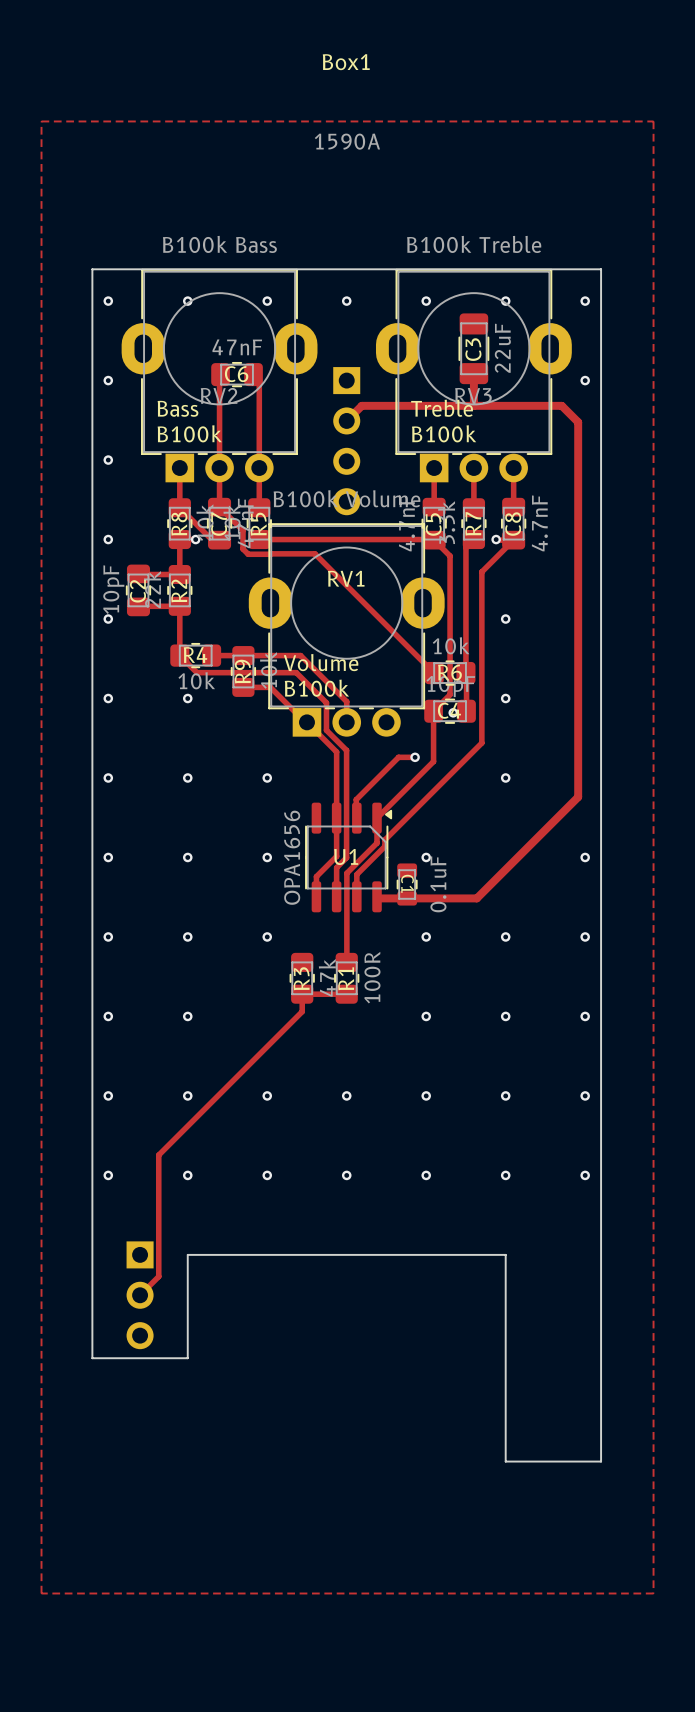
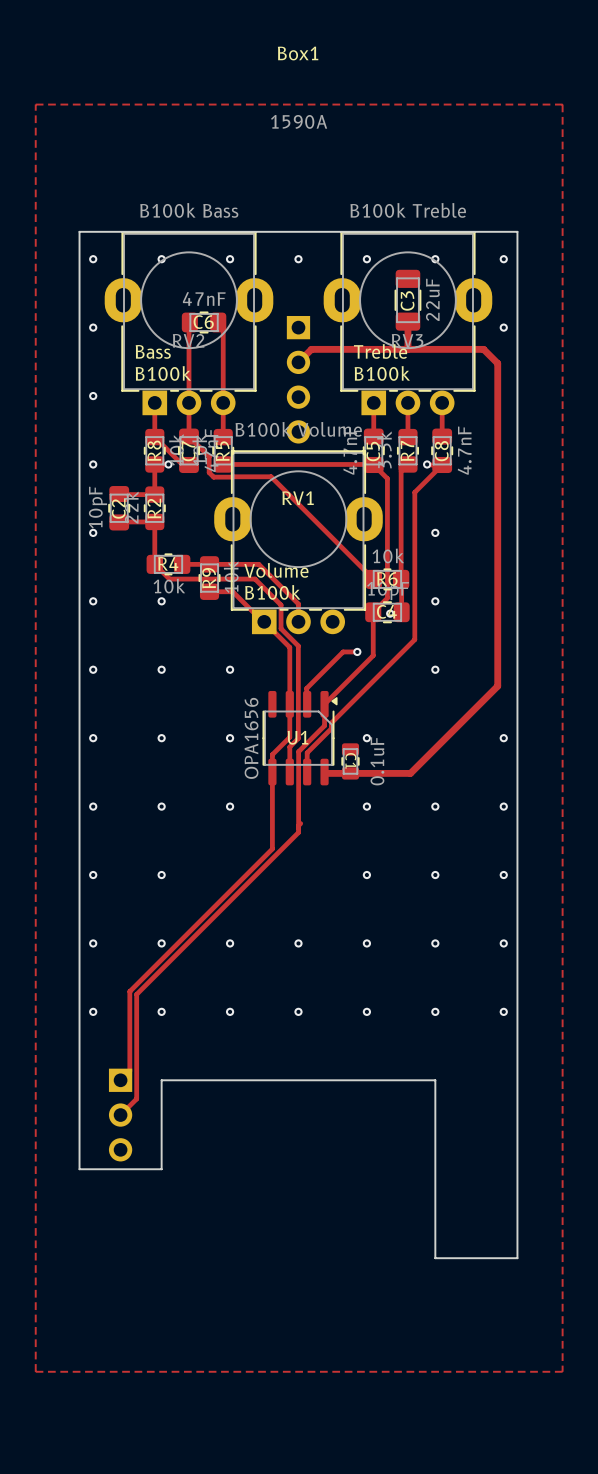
track: none -> (272, 772) (272, 848) (129, 991) (129, 1071) (120, 1080)
R3: 47k (302, 978) -> none
R1: 100R (346, 978) -> none
track: (346, 994) (302, 994) (302, 1011) -> (298, 825) (298, 832) (260, 870)

